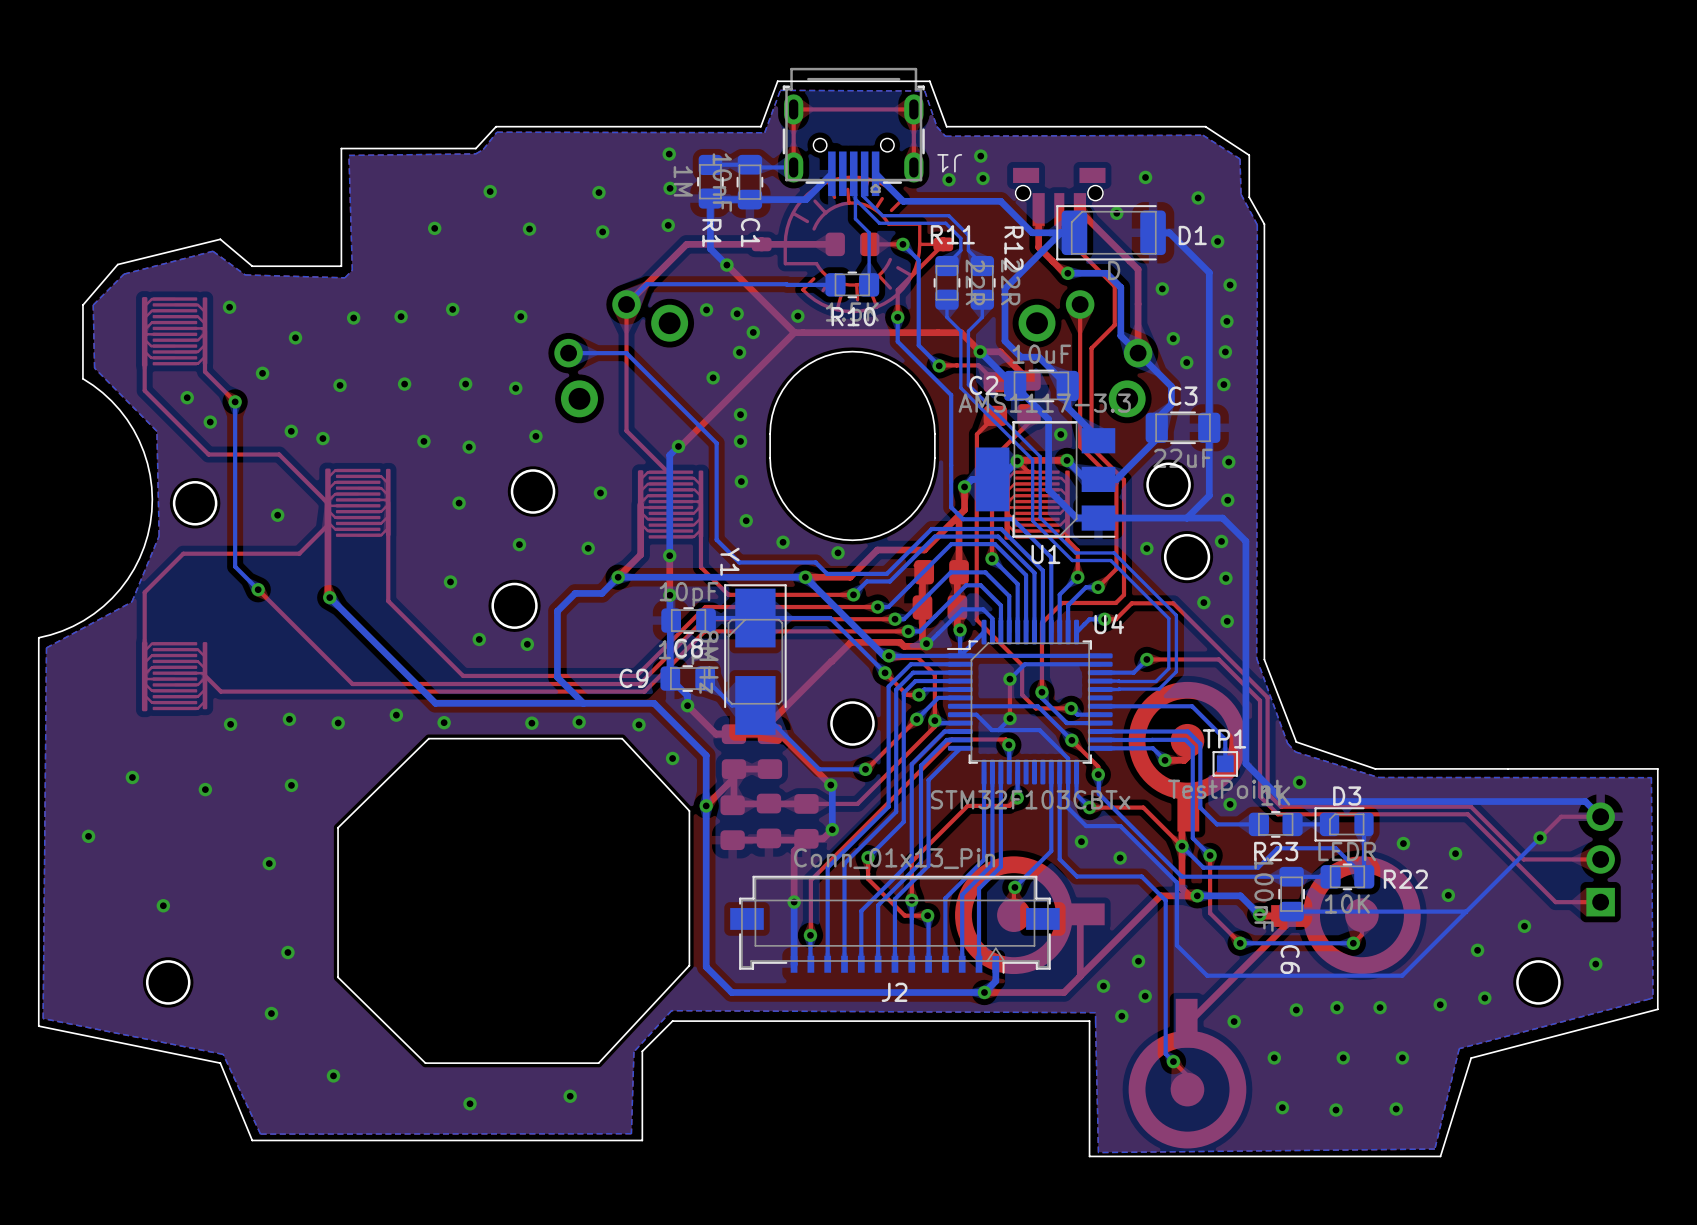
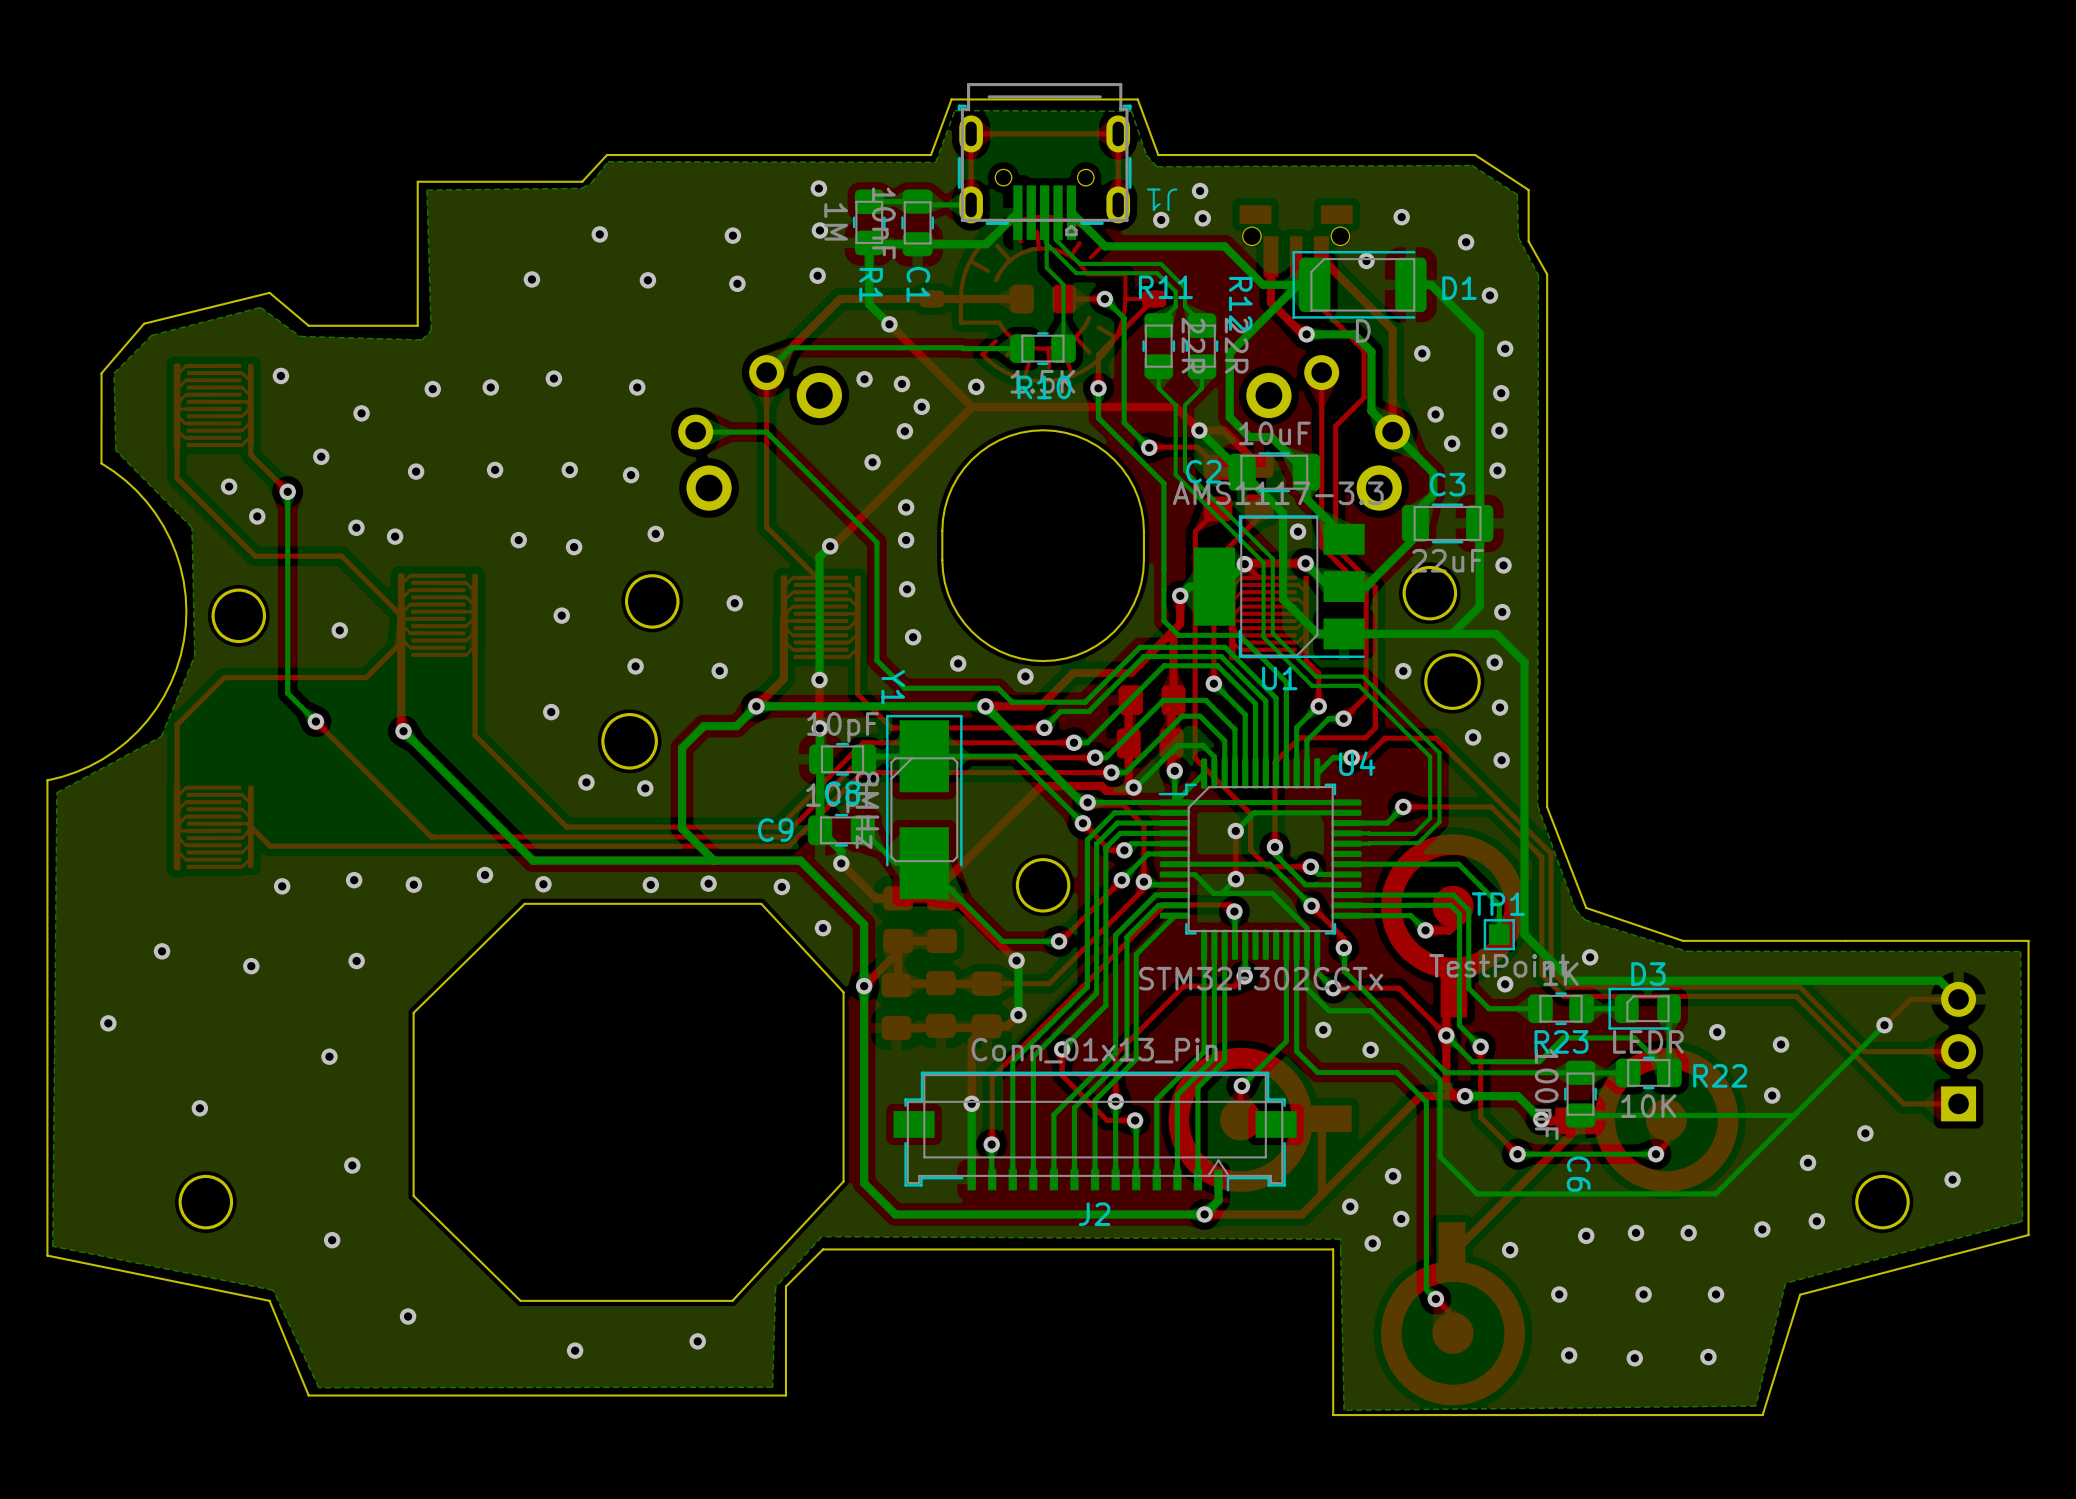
U4 value: STM32F103CBTx (1030, 799) -> STM32F302CCTx (1261, 978)

